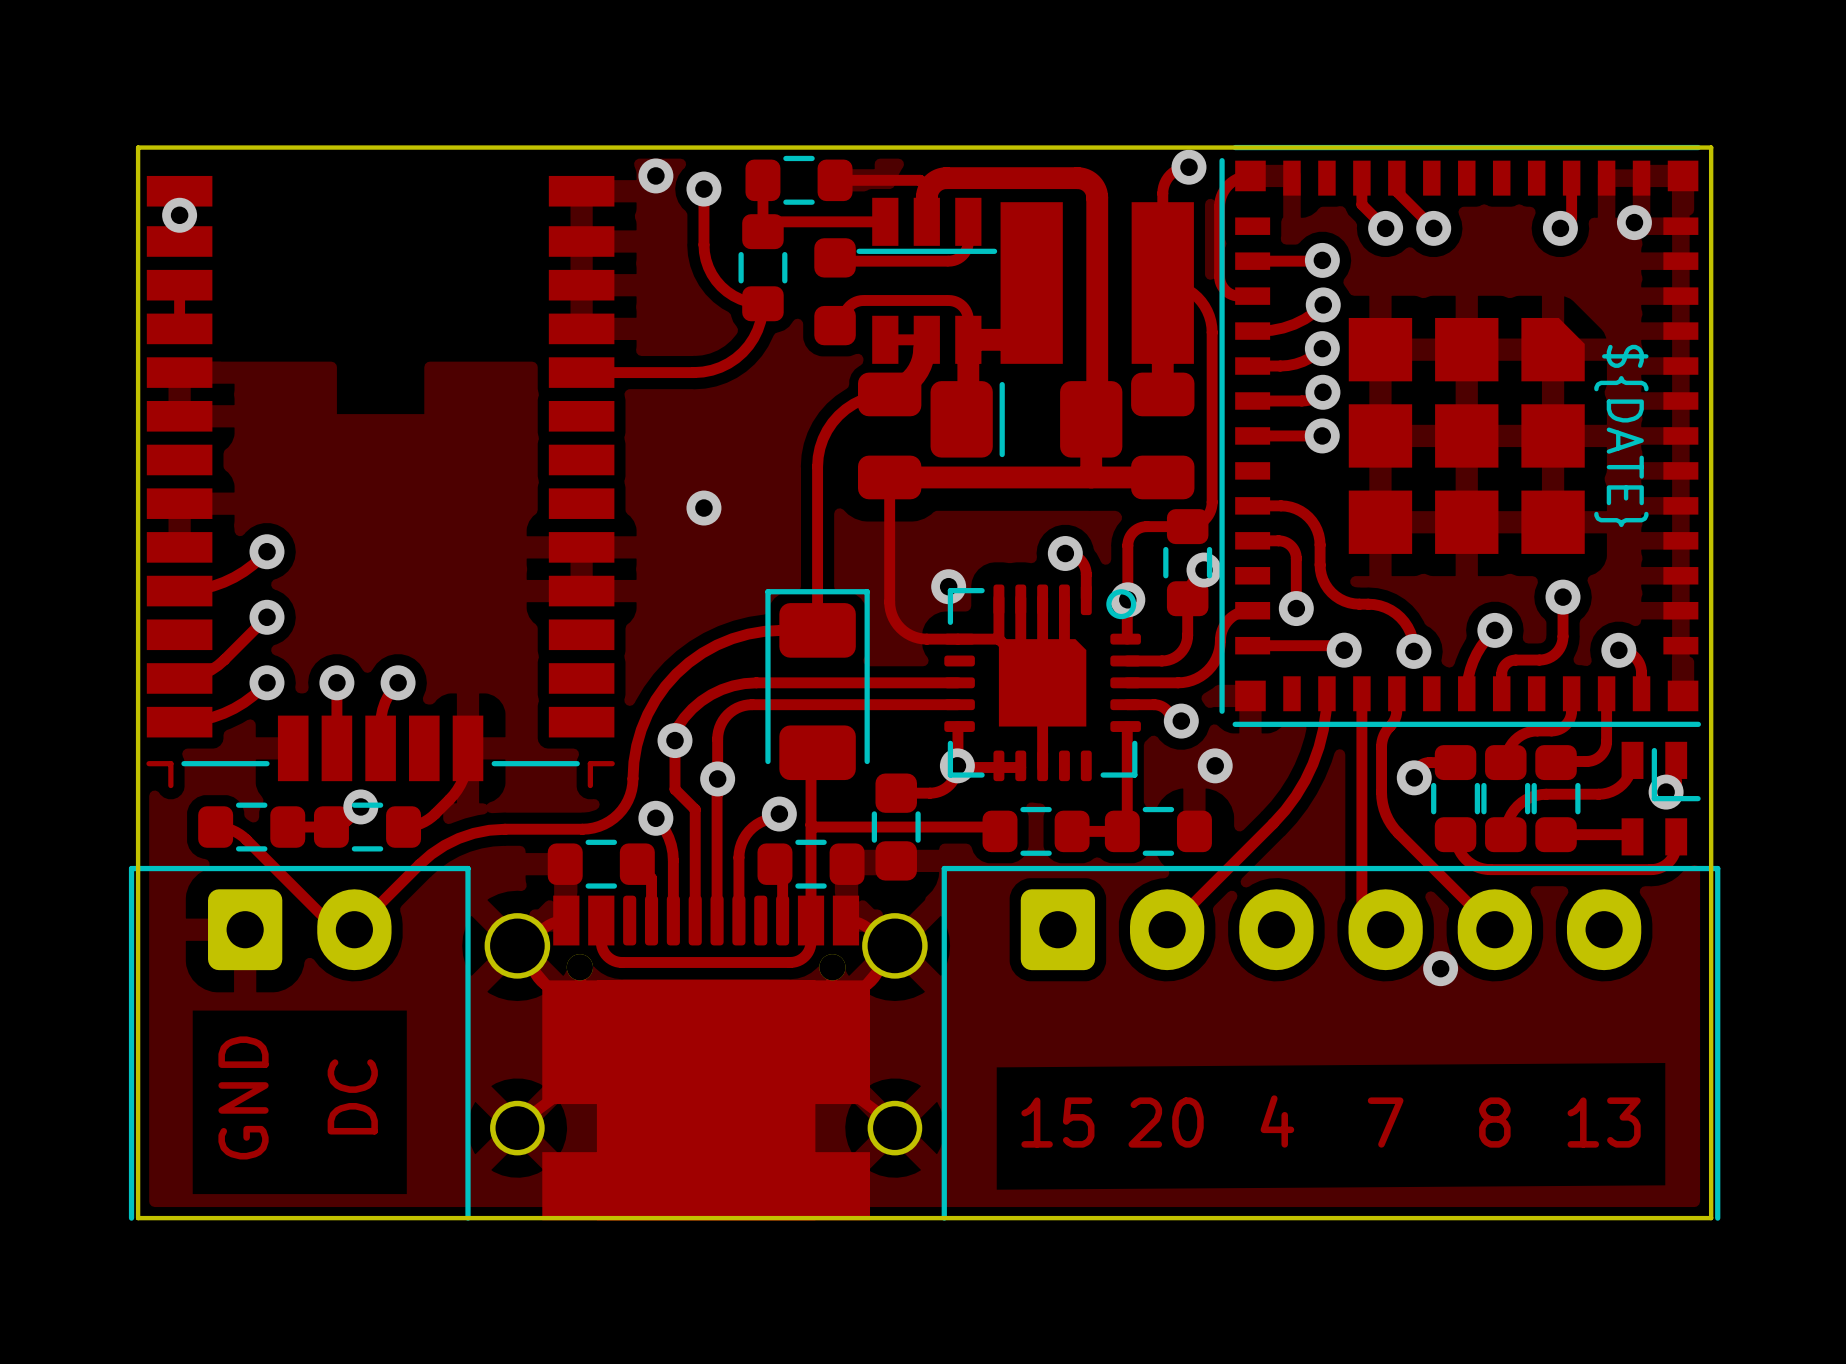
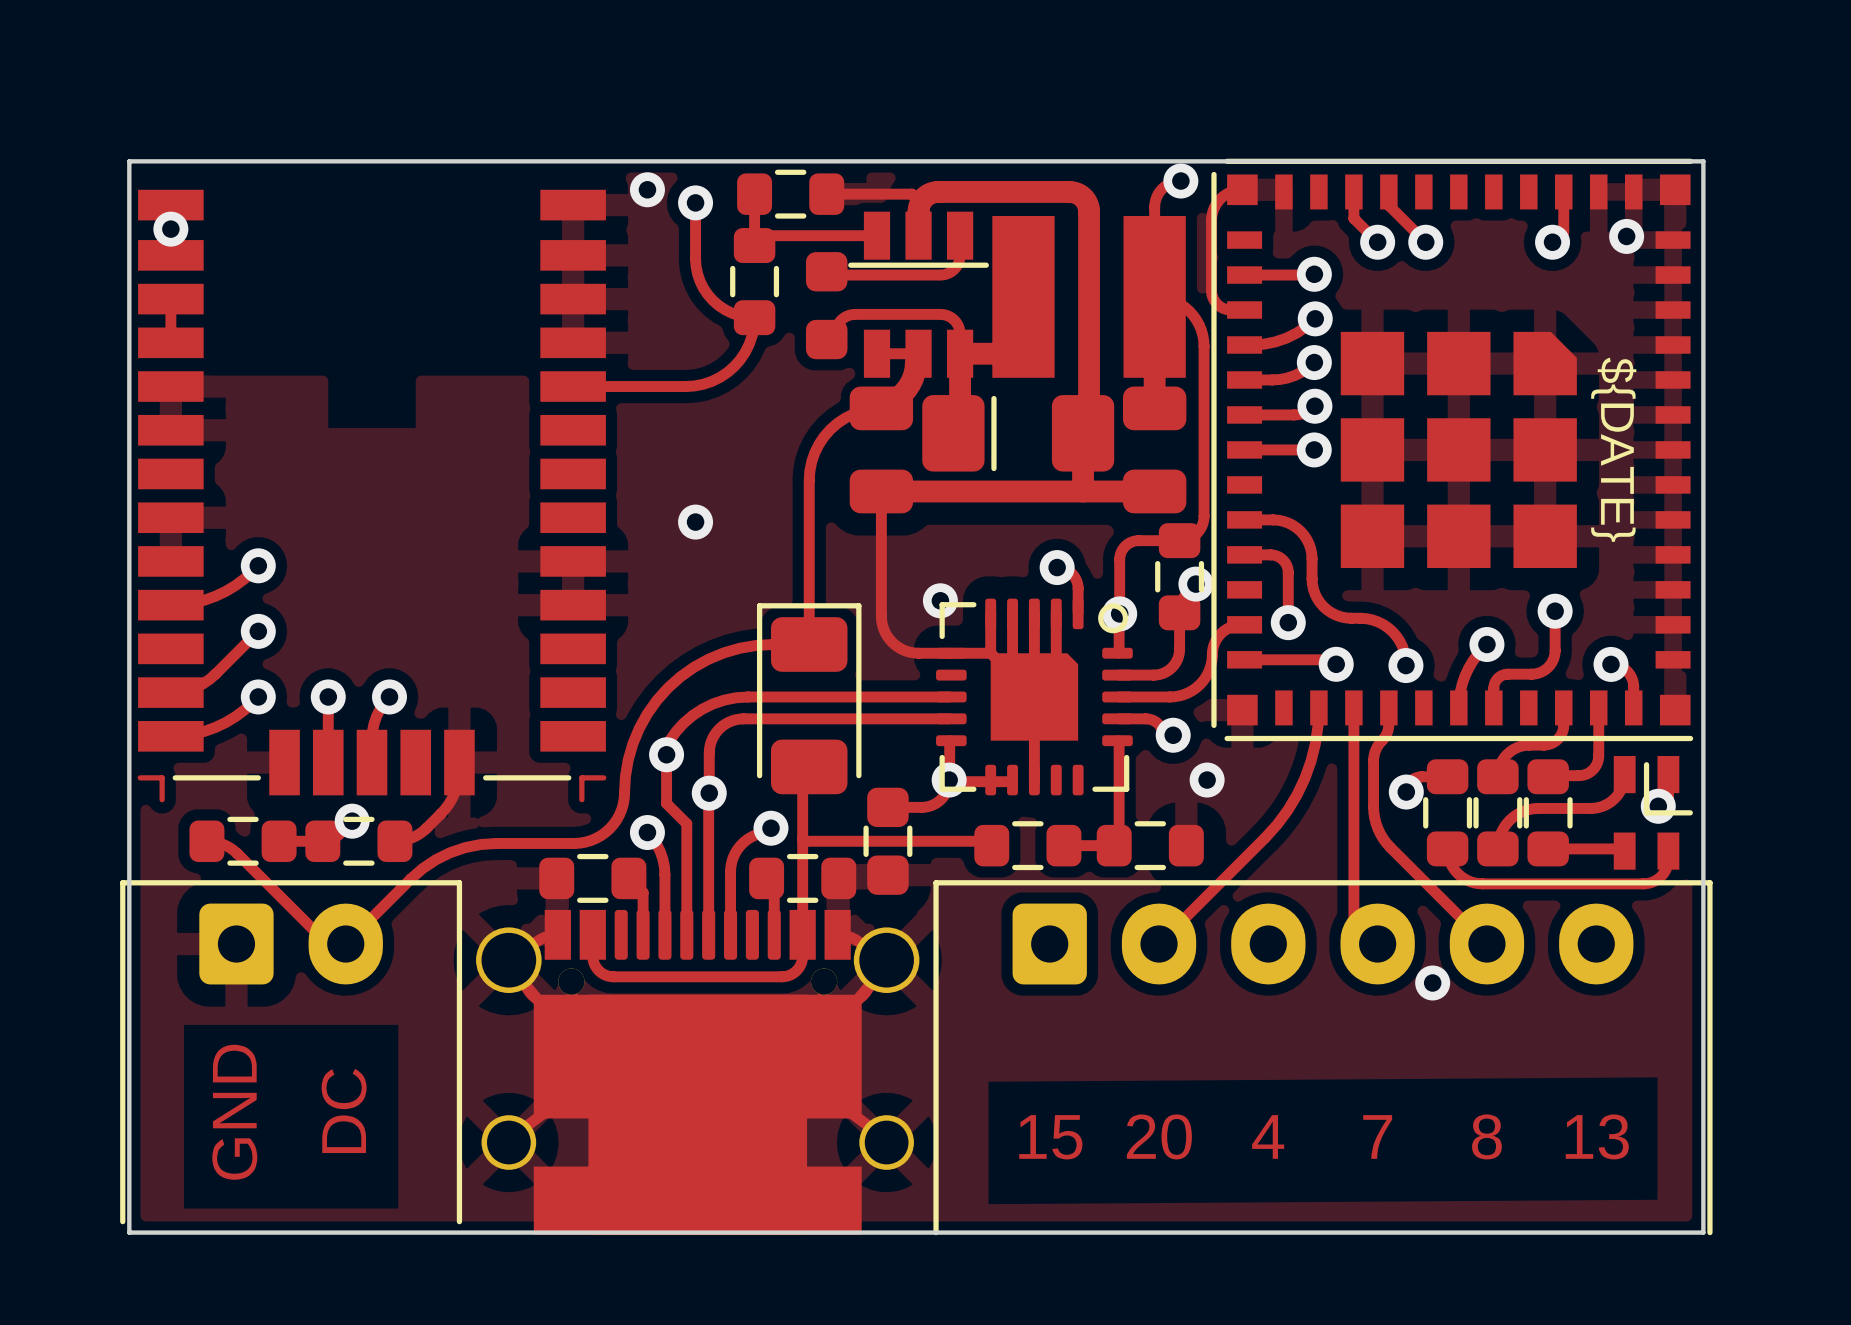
part footprint: [128, 865, 471, 1221] -> [120, 880, 463, 1225]

